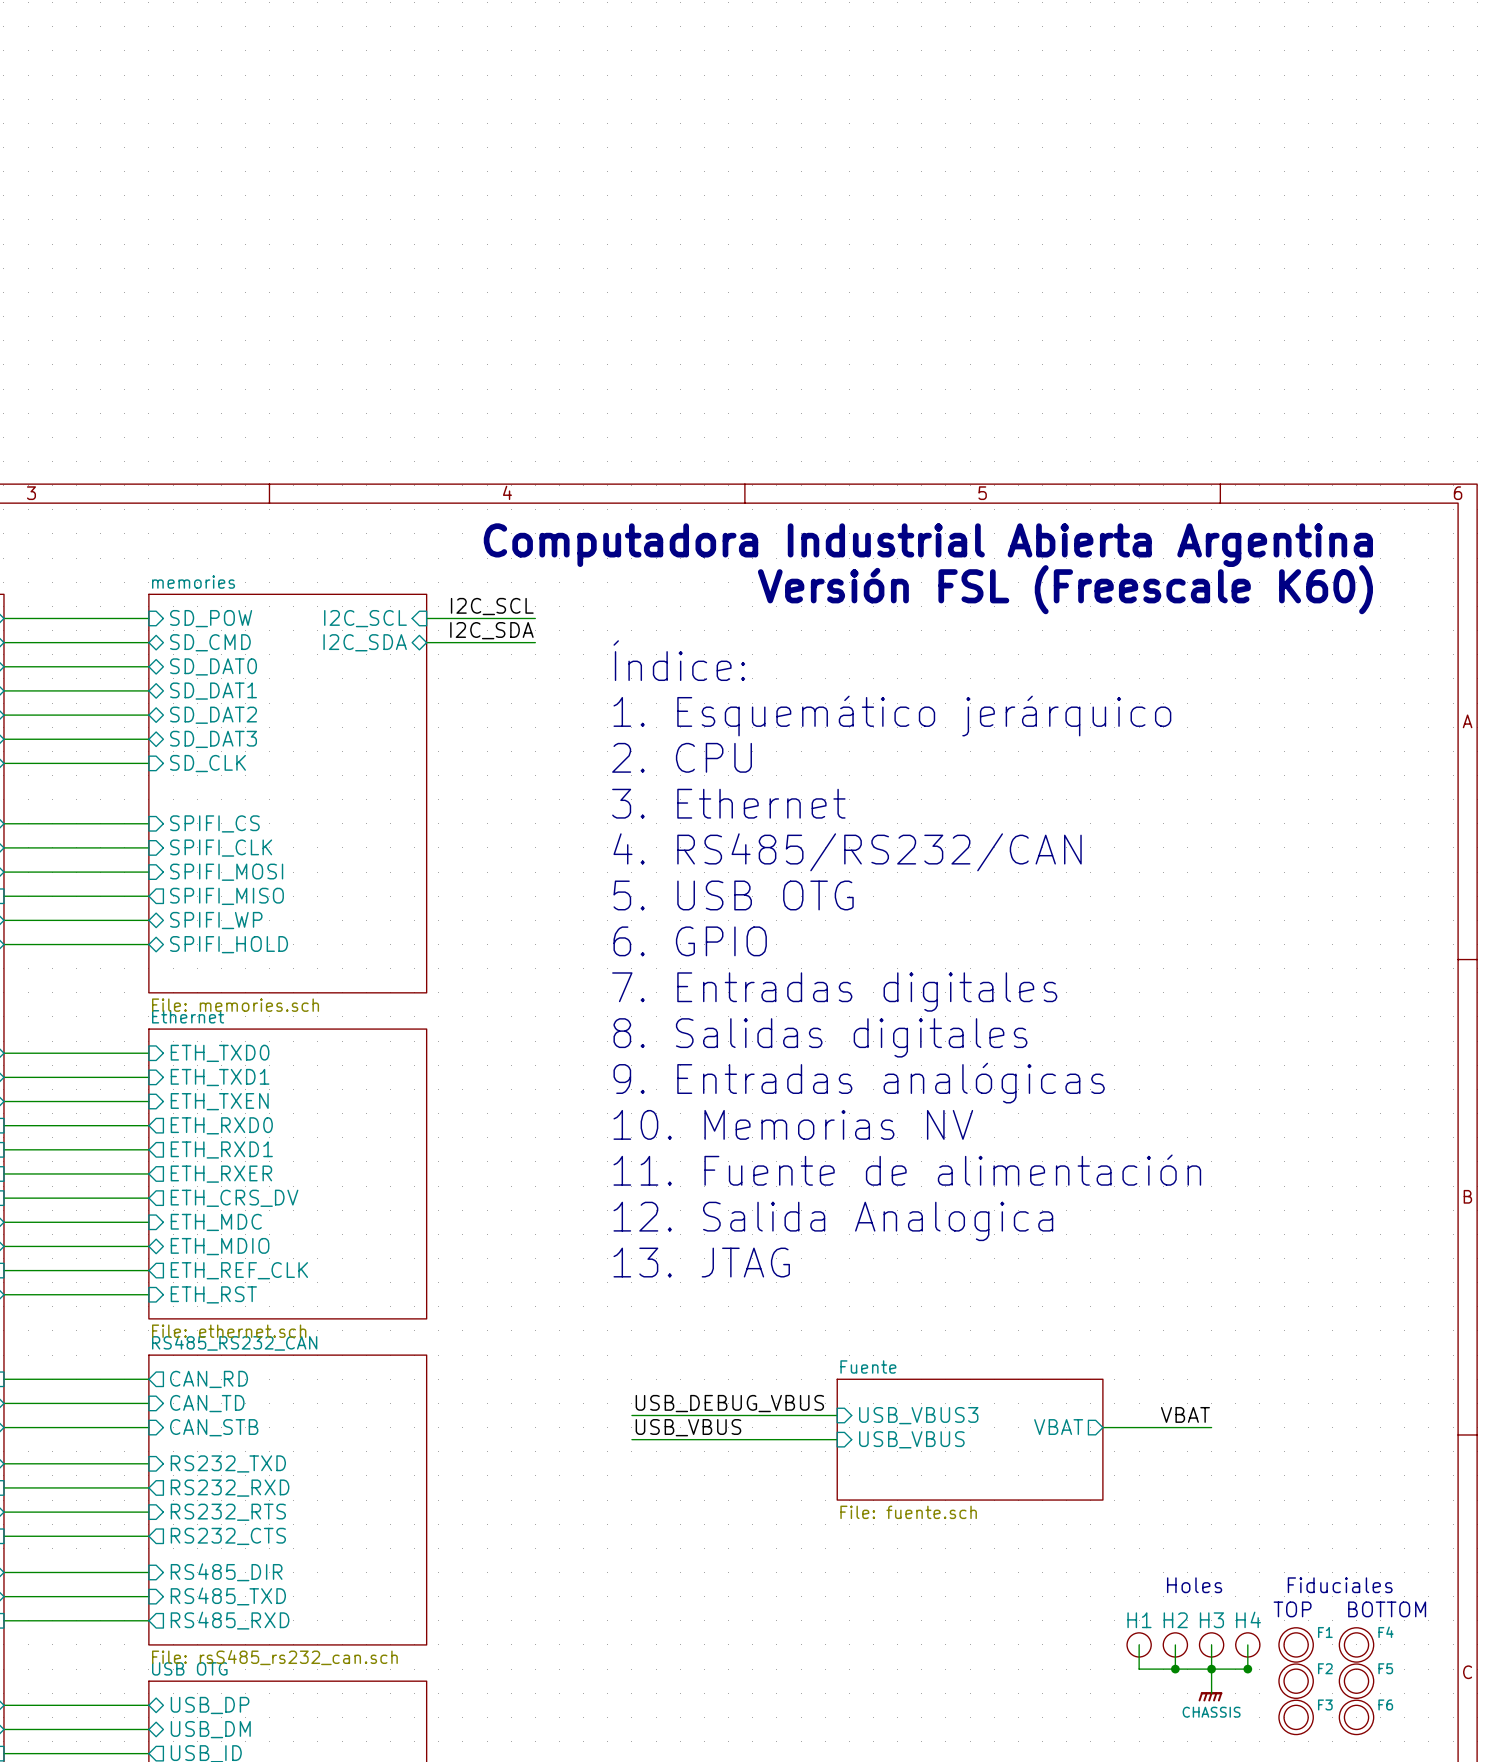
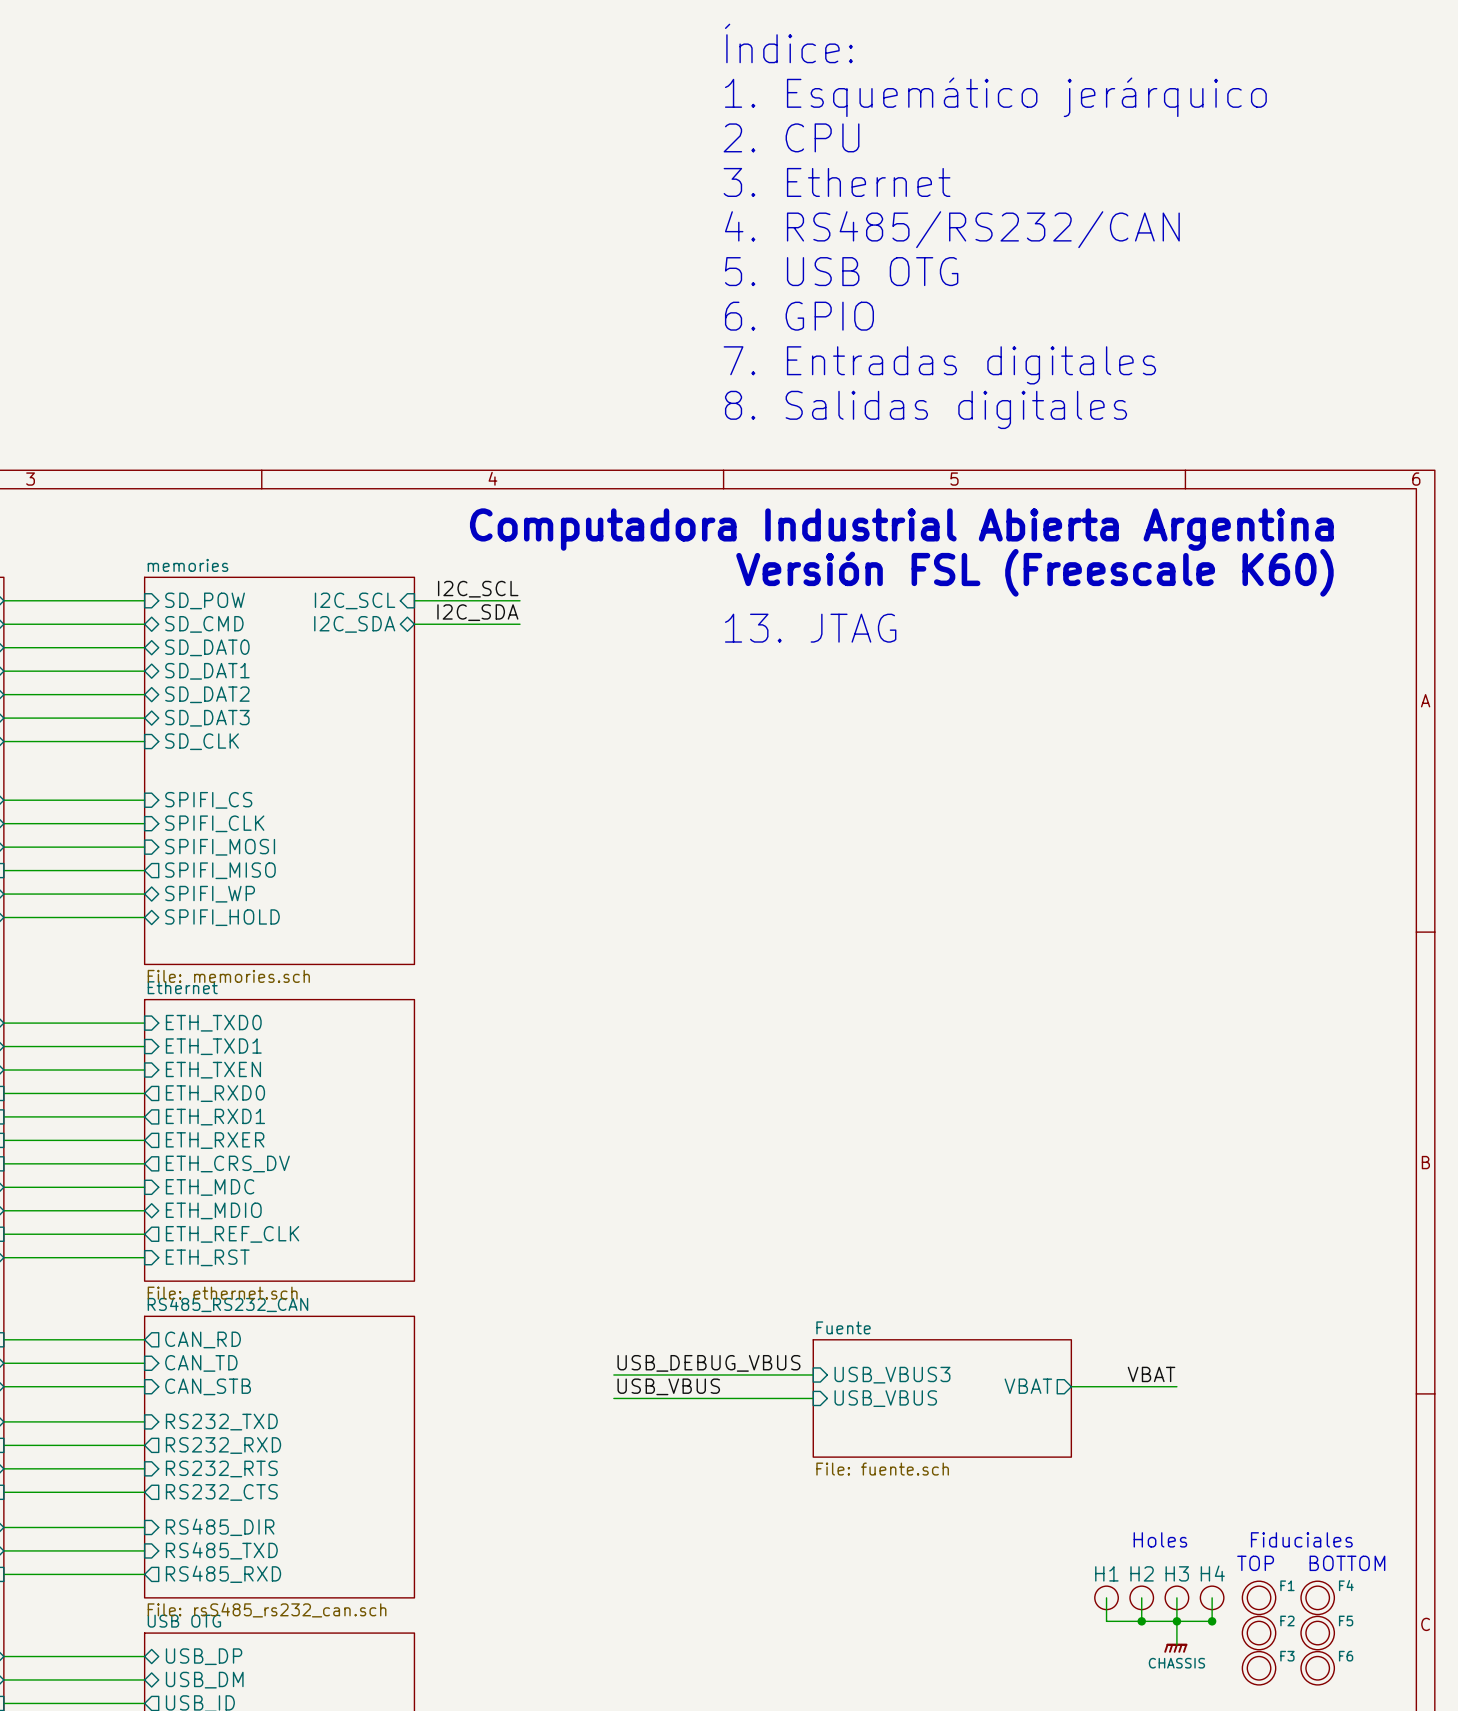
text: none -> Índice: (788, 43)
text: none -> 1. Esquemático jerárquico (995, 97)
text: none -> 2. CPU (791, 137)
text: none -> 3. Ethernet (837, 182)
text: none -> 4. RS485/RS232/CAN (952, 229)
text: none -> 5. USB OTG (841, 271)
text: none -> 6. GPIO (799, 316)
text: none -> 7. Entradas digitales (939, 365)
text: none -> 8. Salidas digitales (926, 409)
text: none -> 13. JTAG (810, 628)
text: Índice: (679, 660) -> none
text: 1. Esquemático jerárquico (892, 716) -> none
text: 2. CPU (682, 757) -> none
text: 3. Ethernet (728, 803) -> none
text: 4. RS485/RS232/CAN (847, 852) -> none
text: 5. USB OTG (733, 895) -> none
text: 6. GPIO (690, 941) -> none
text: 7. Entradas digitales (834, 991) -> none
text: 8. Salidas digitales (820, 1037) -> none
text: 9. Entradas analógicas (859, 1083) -> none
text: 10. Memorias NV (793, 1124) -> none
text: 11. Fuente de alimentación (907, 1170) -> none
text: 12. Salida Analogica (833, 1221) -> none
text: 13. JTAG (701, 1262) -> none

